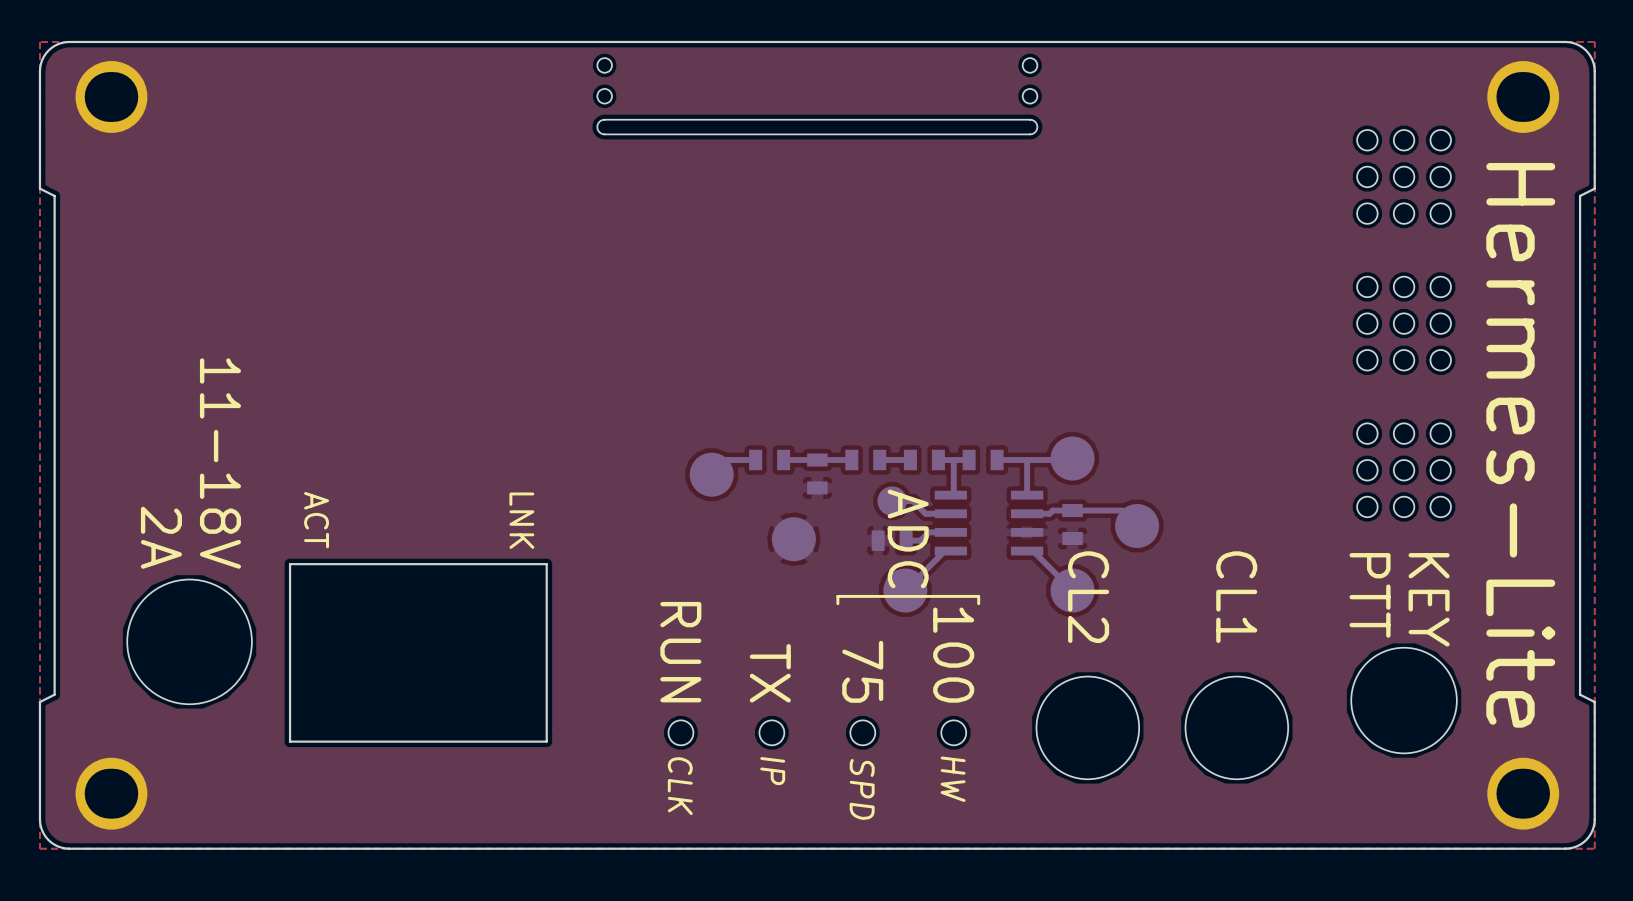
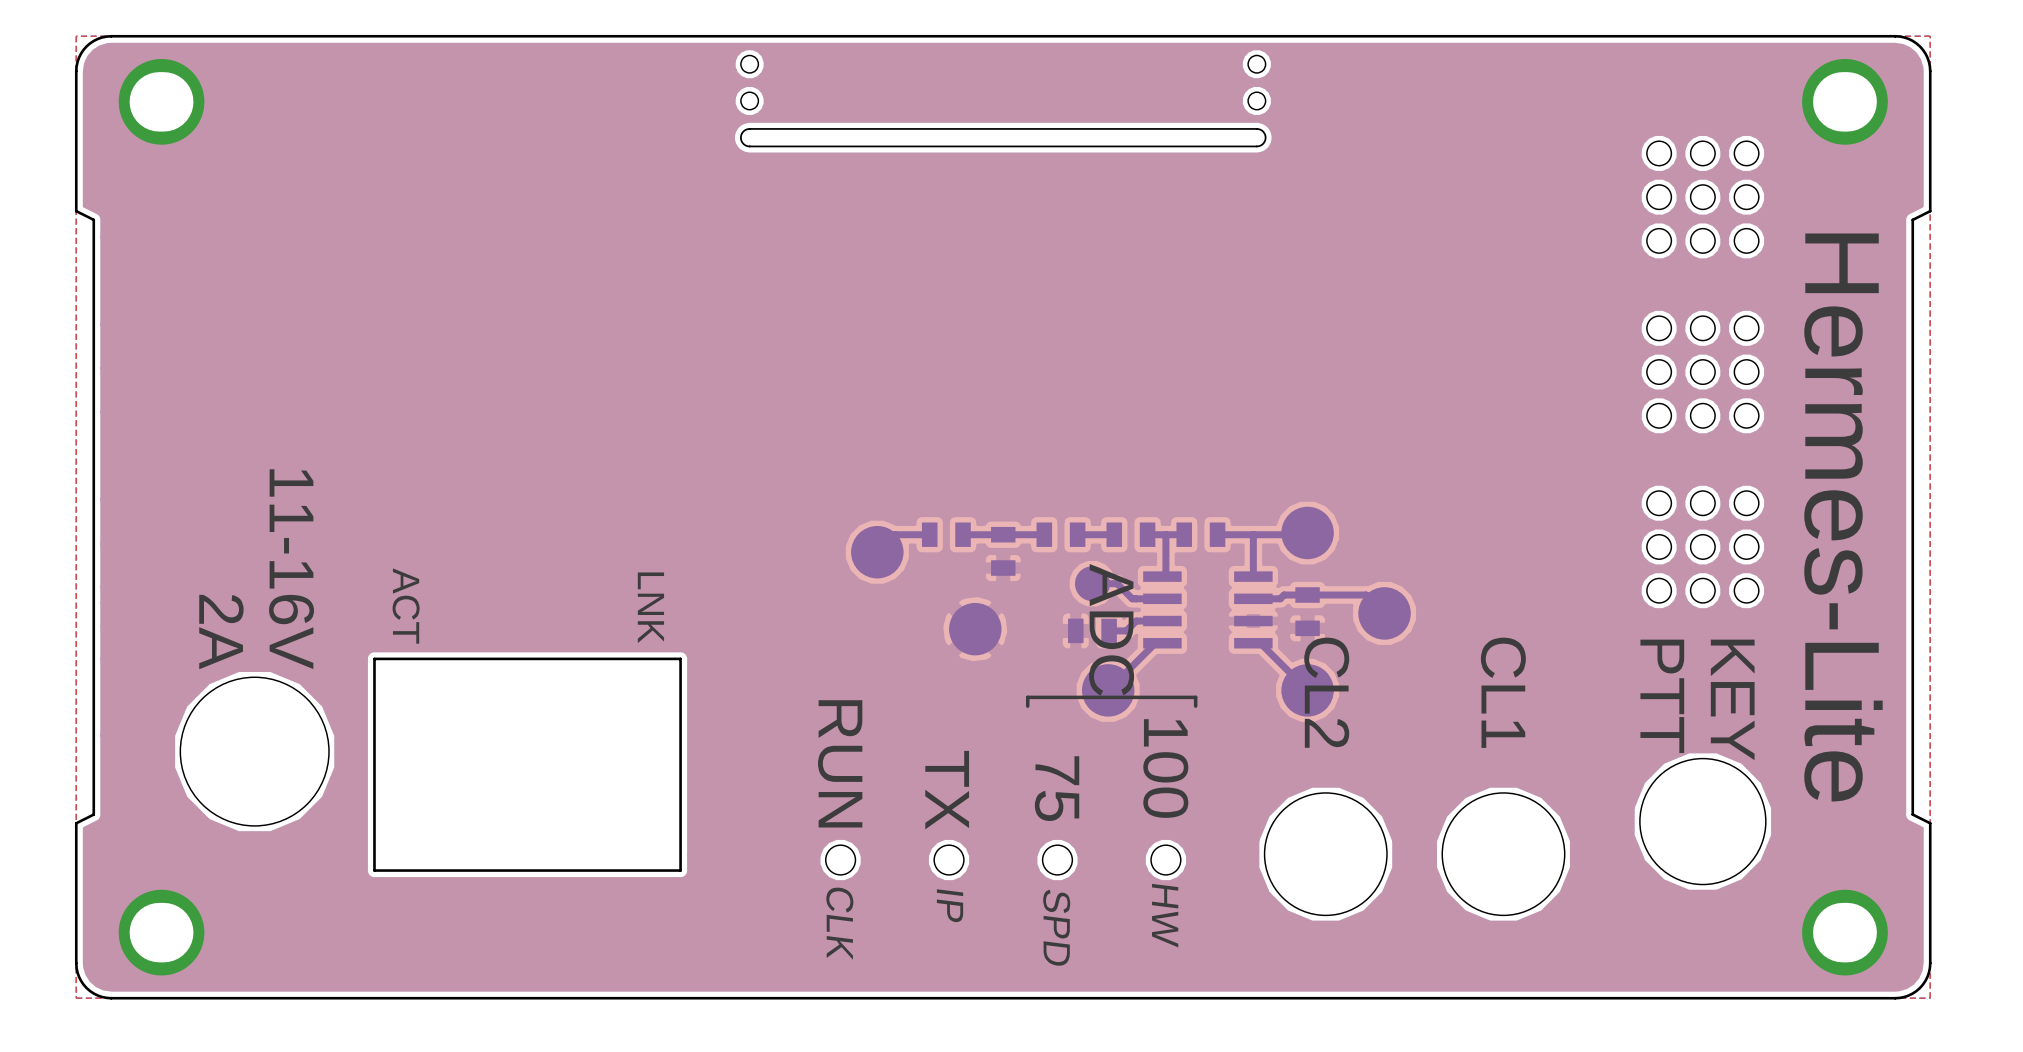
text: 11-18V (220, 463) -> 11-16V (291, 569)

